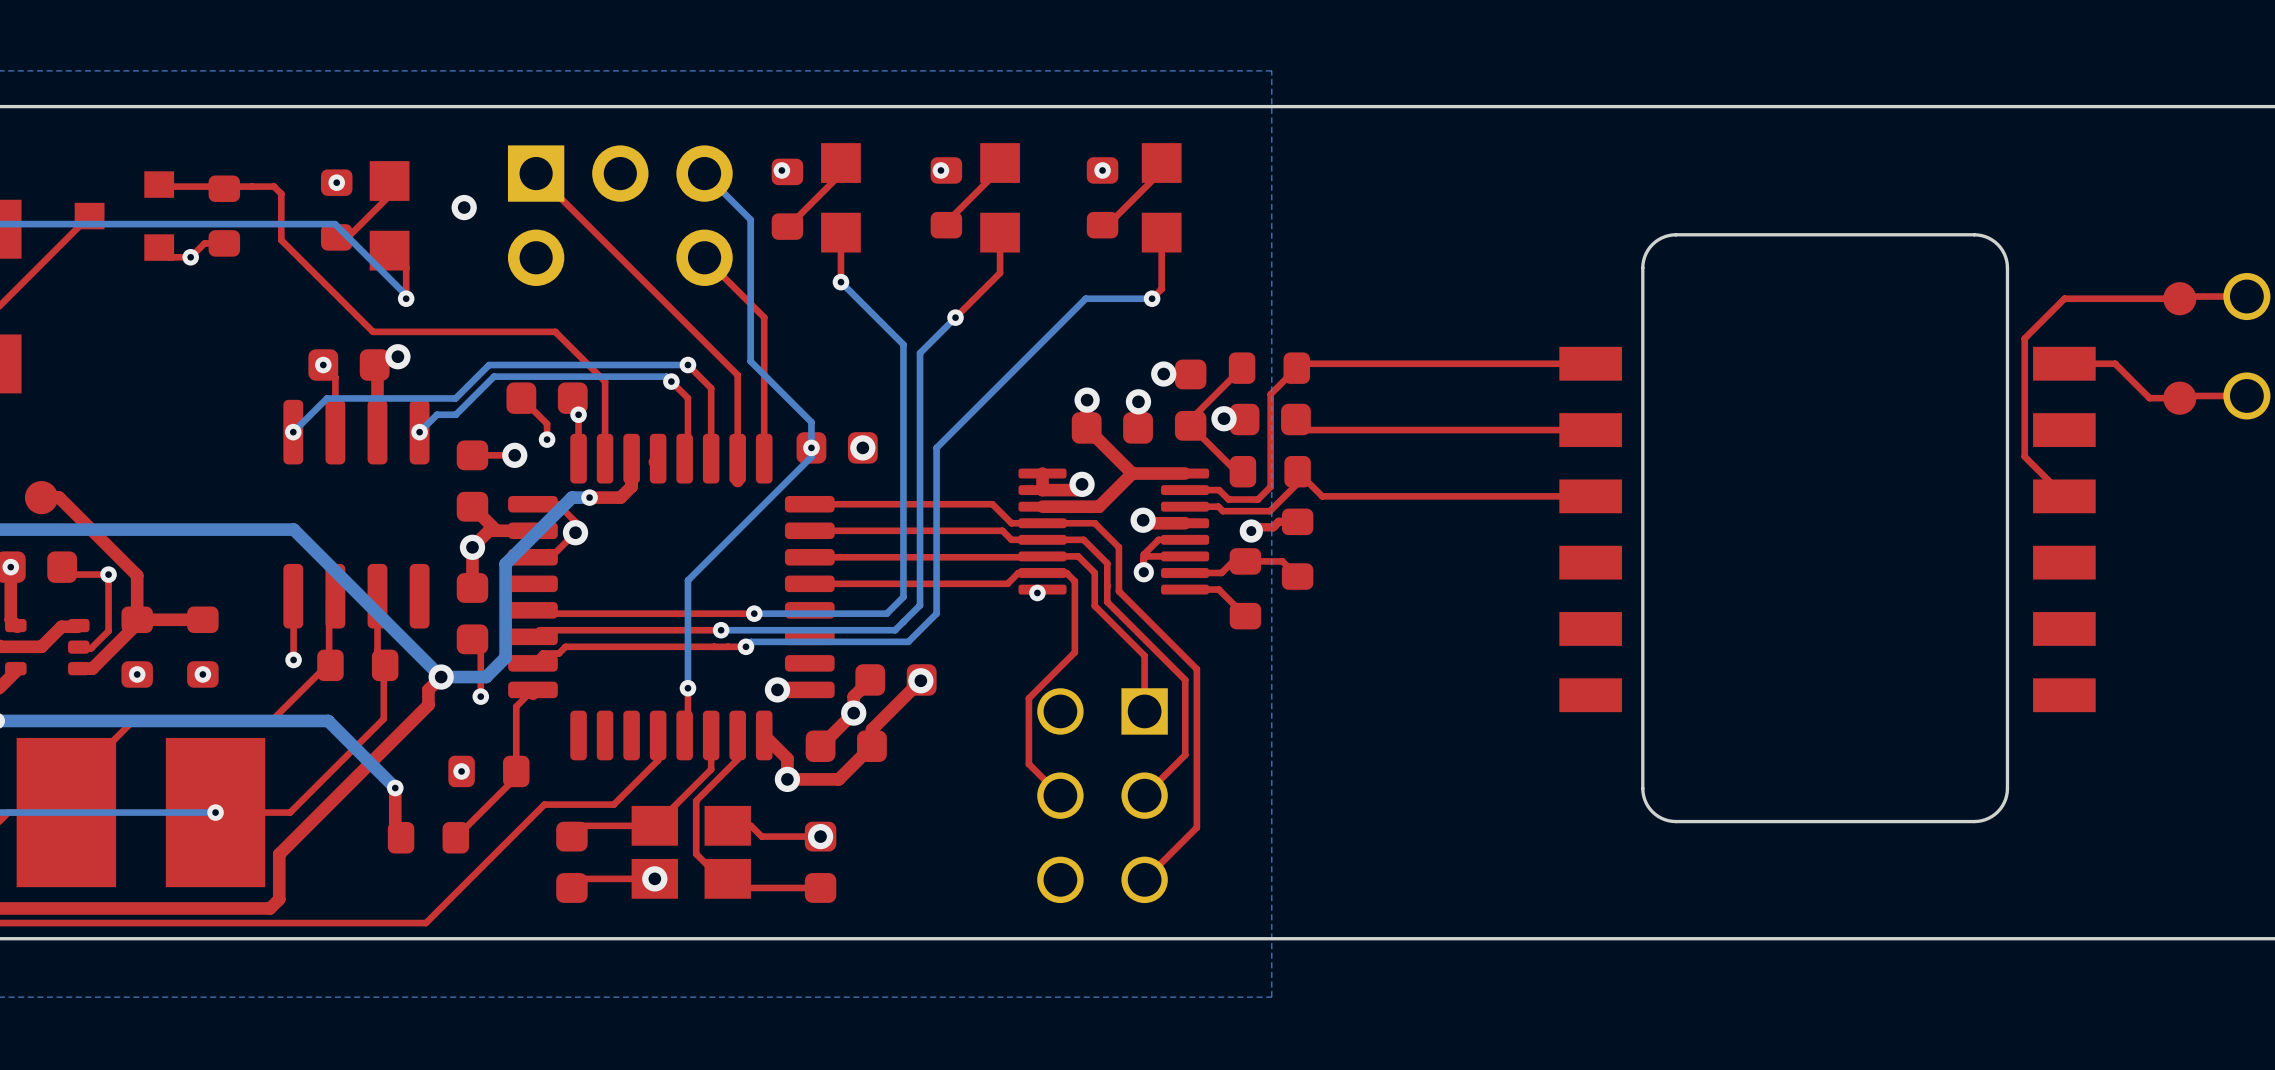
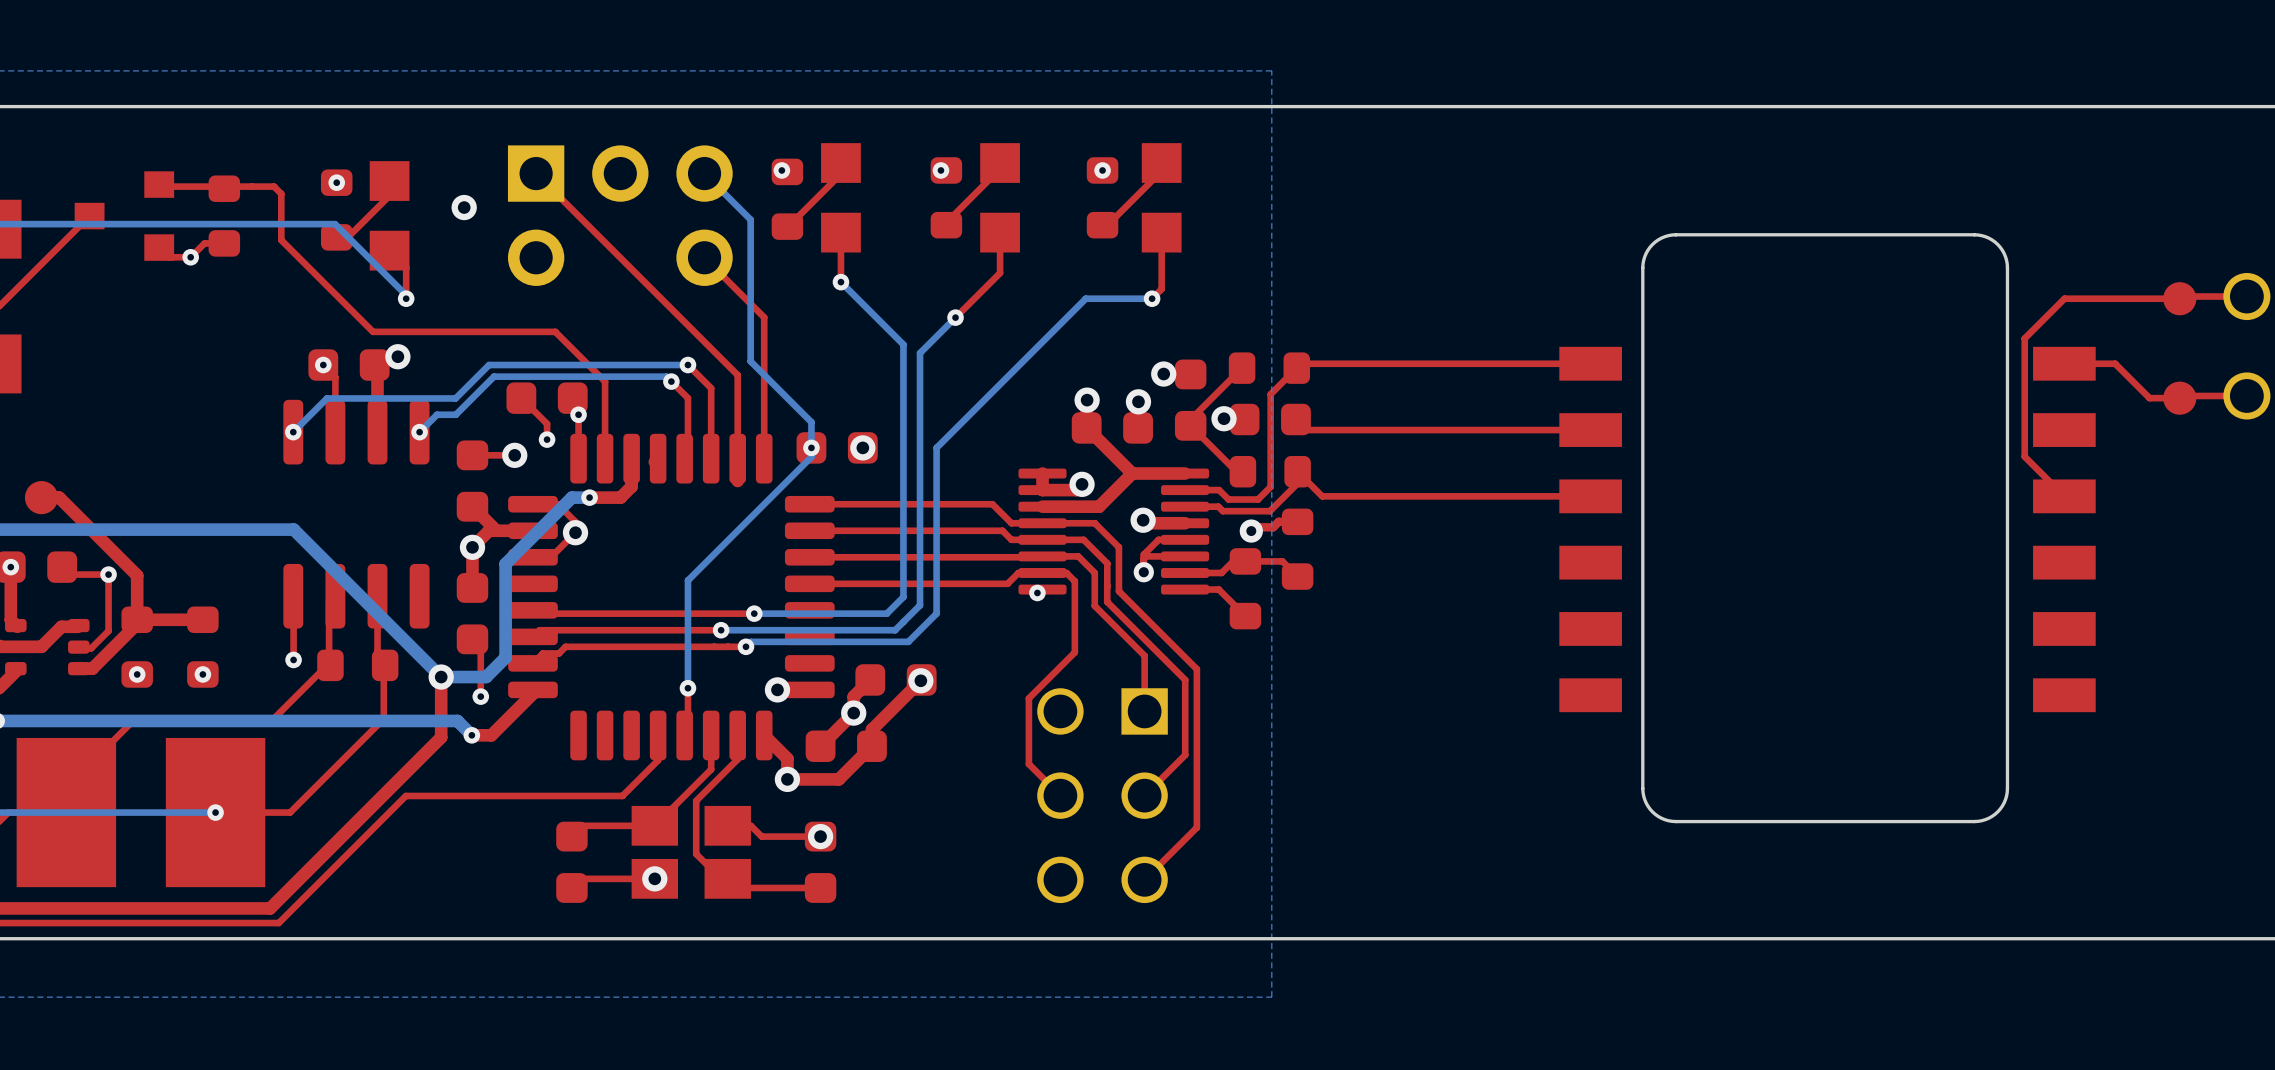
top track: (441, 677) (428, 689) (428, 705) (279, 854) (279, 899) -> (441, 677) (441, 737) (279, 899)
top track: (532, 689) (516, 706) (516, 777) (455, 837) -> none
top track: none -> (532, 693) (491, 735) (471, 735)
bottom track: (328, 720) (395, 788) -> (328, 720) (457, 720) (471, 735)
via position: (461, 771) -> (471, 735)
part: (488, 771) -> none
top track: (395, 788) (395, 831) (401, 837) -> none
via: (395, 788) -> none
top track: (622, 795) (613, 804) (544, 804) (426, 923) (278, 923) -> (622, 795) (405, 795) (278, 923)
part: (428, 837) -> none

